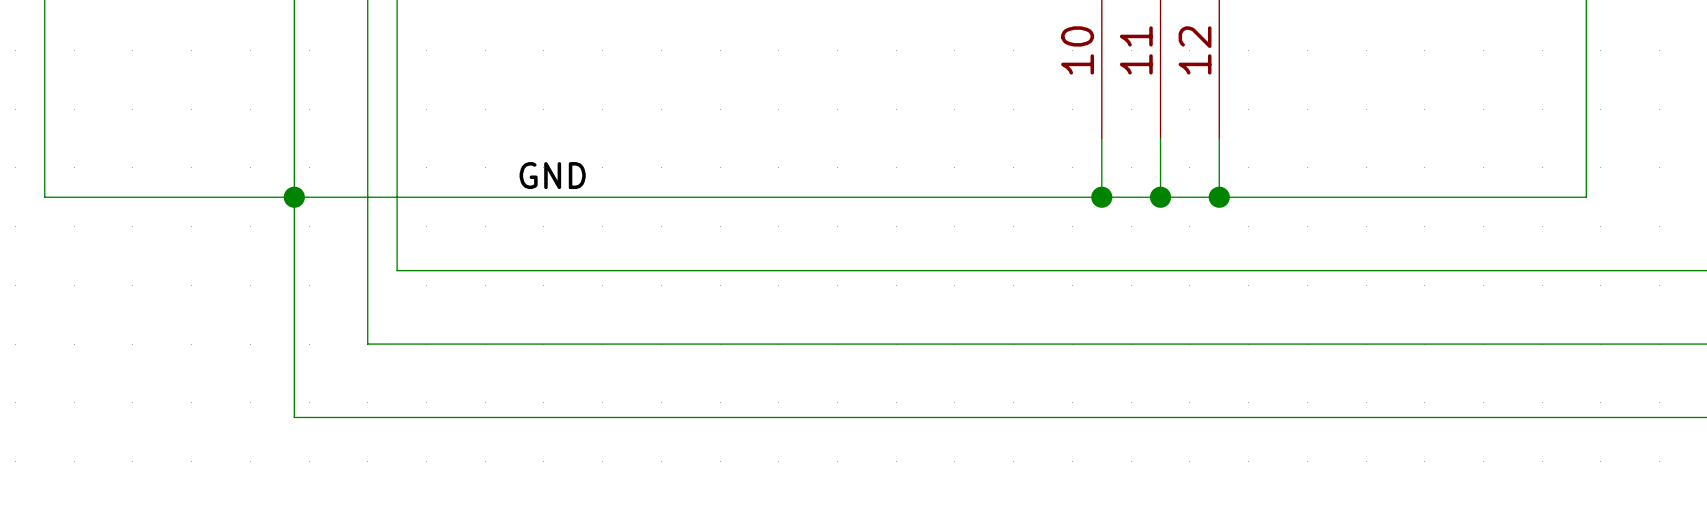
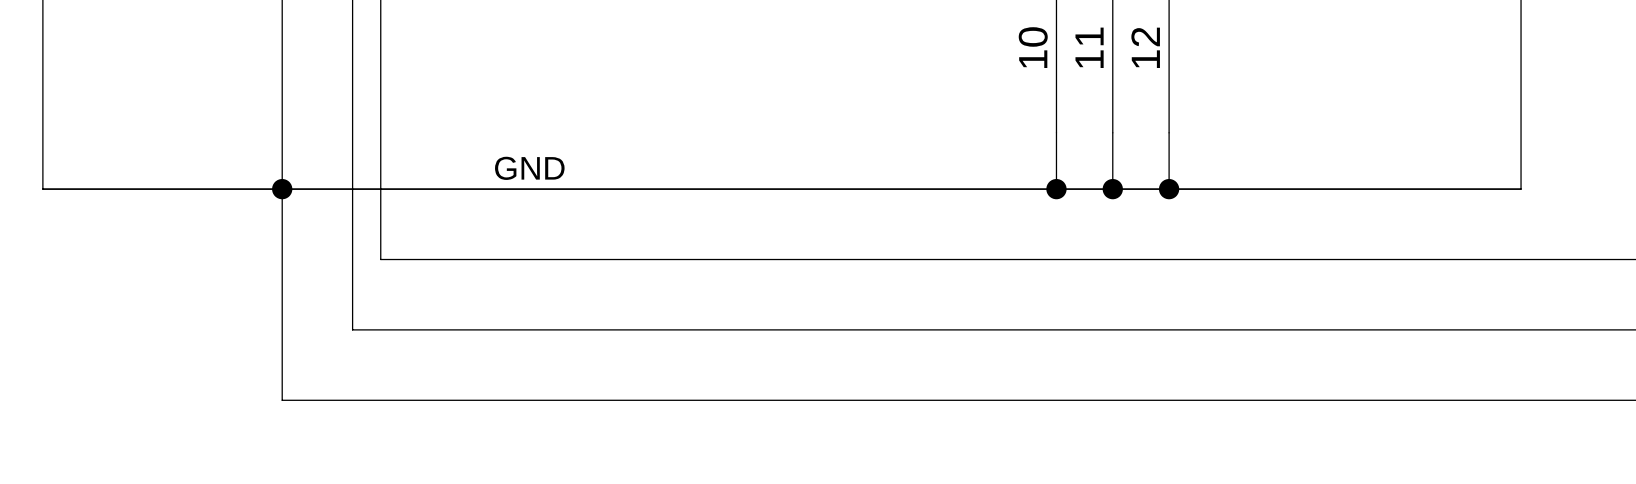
bus: none -> (42, 189) (1521, 189)

